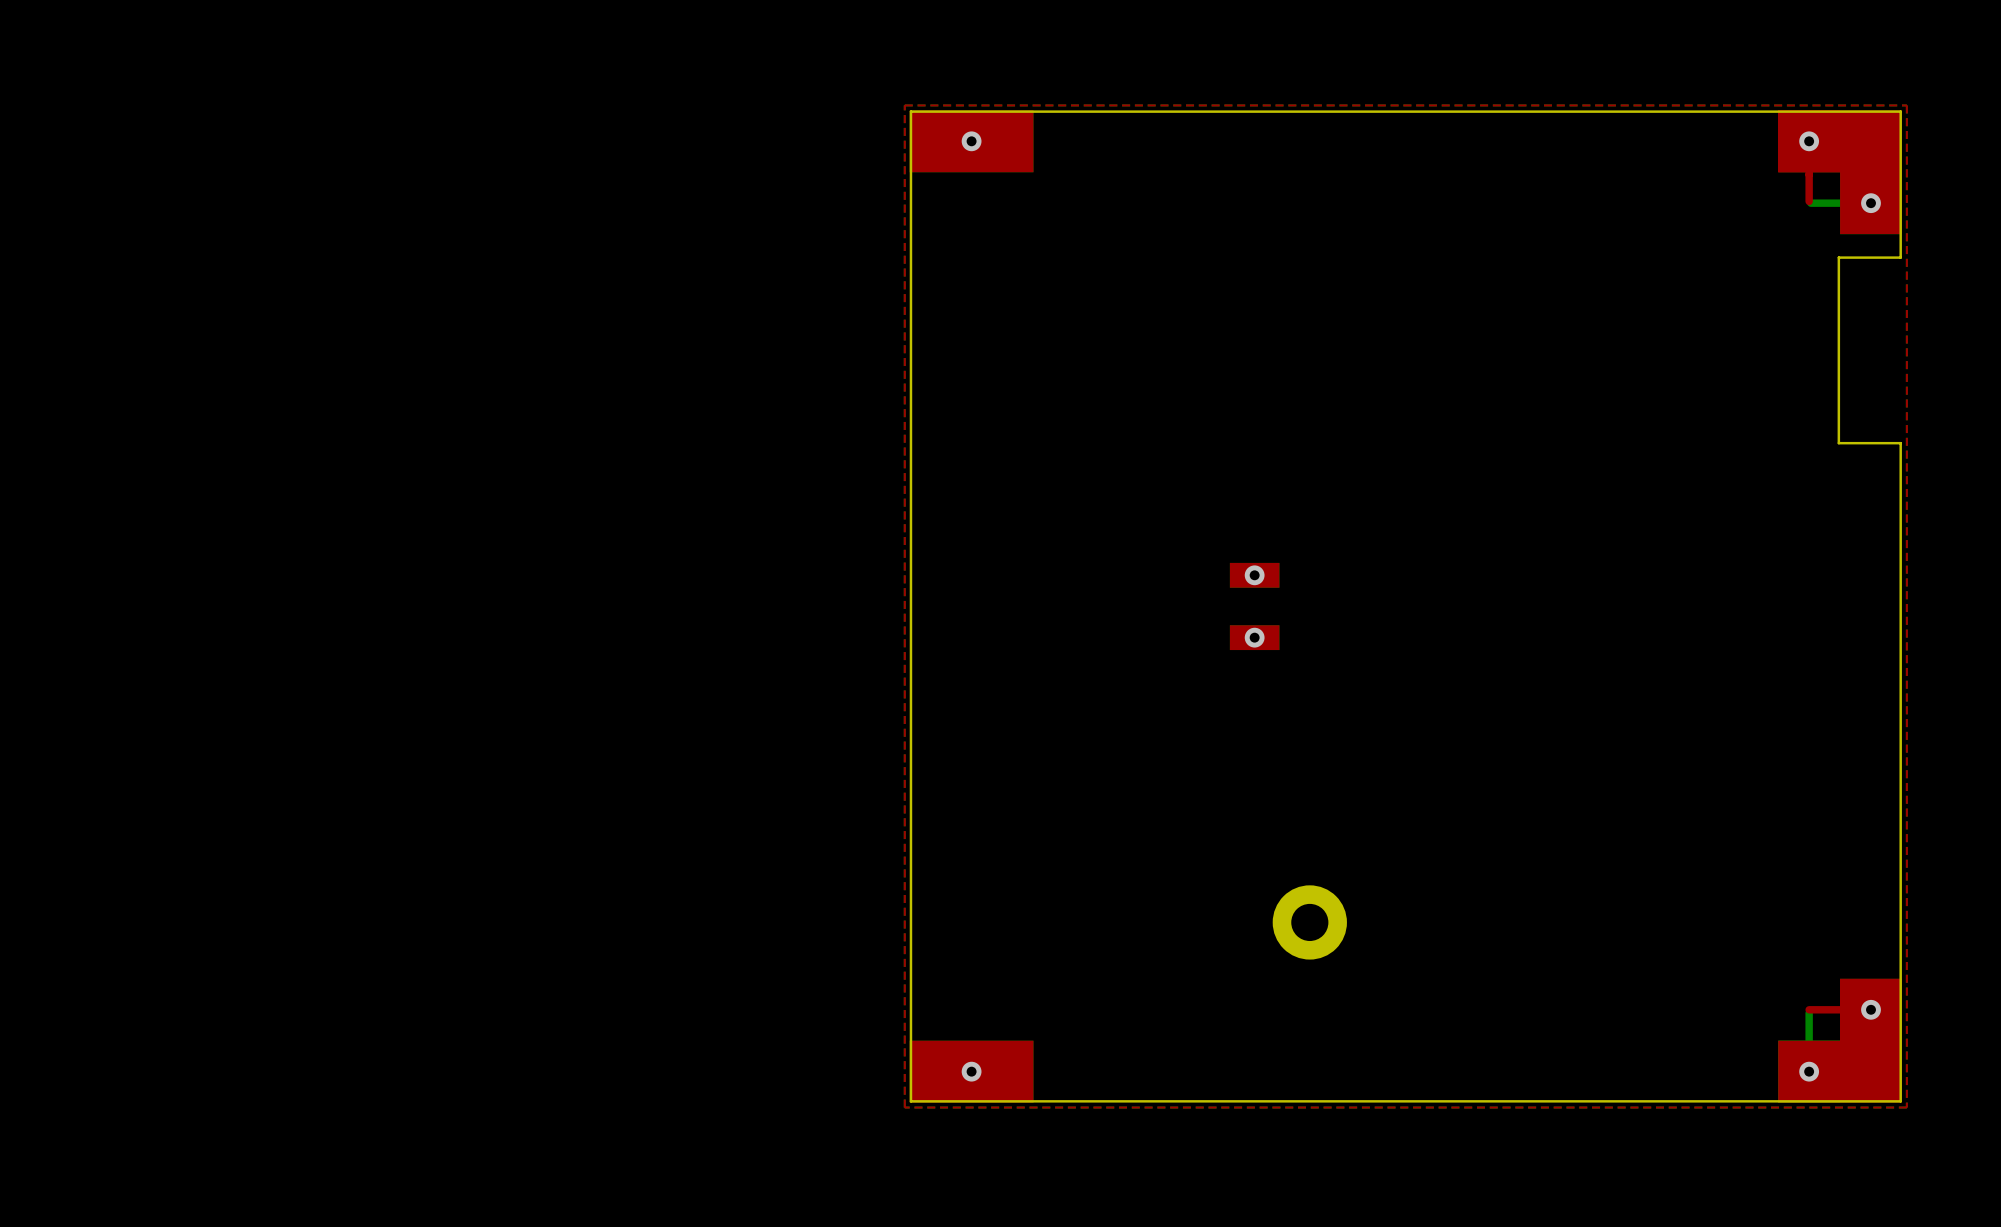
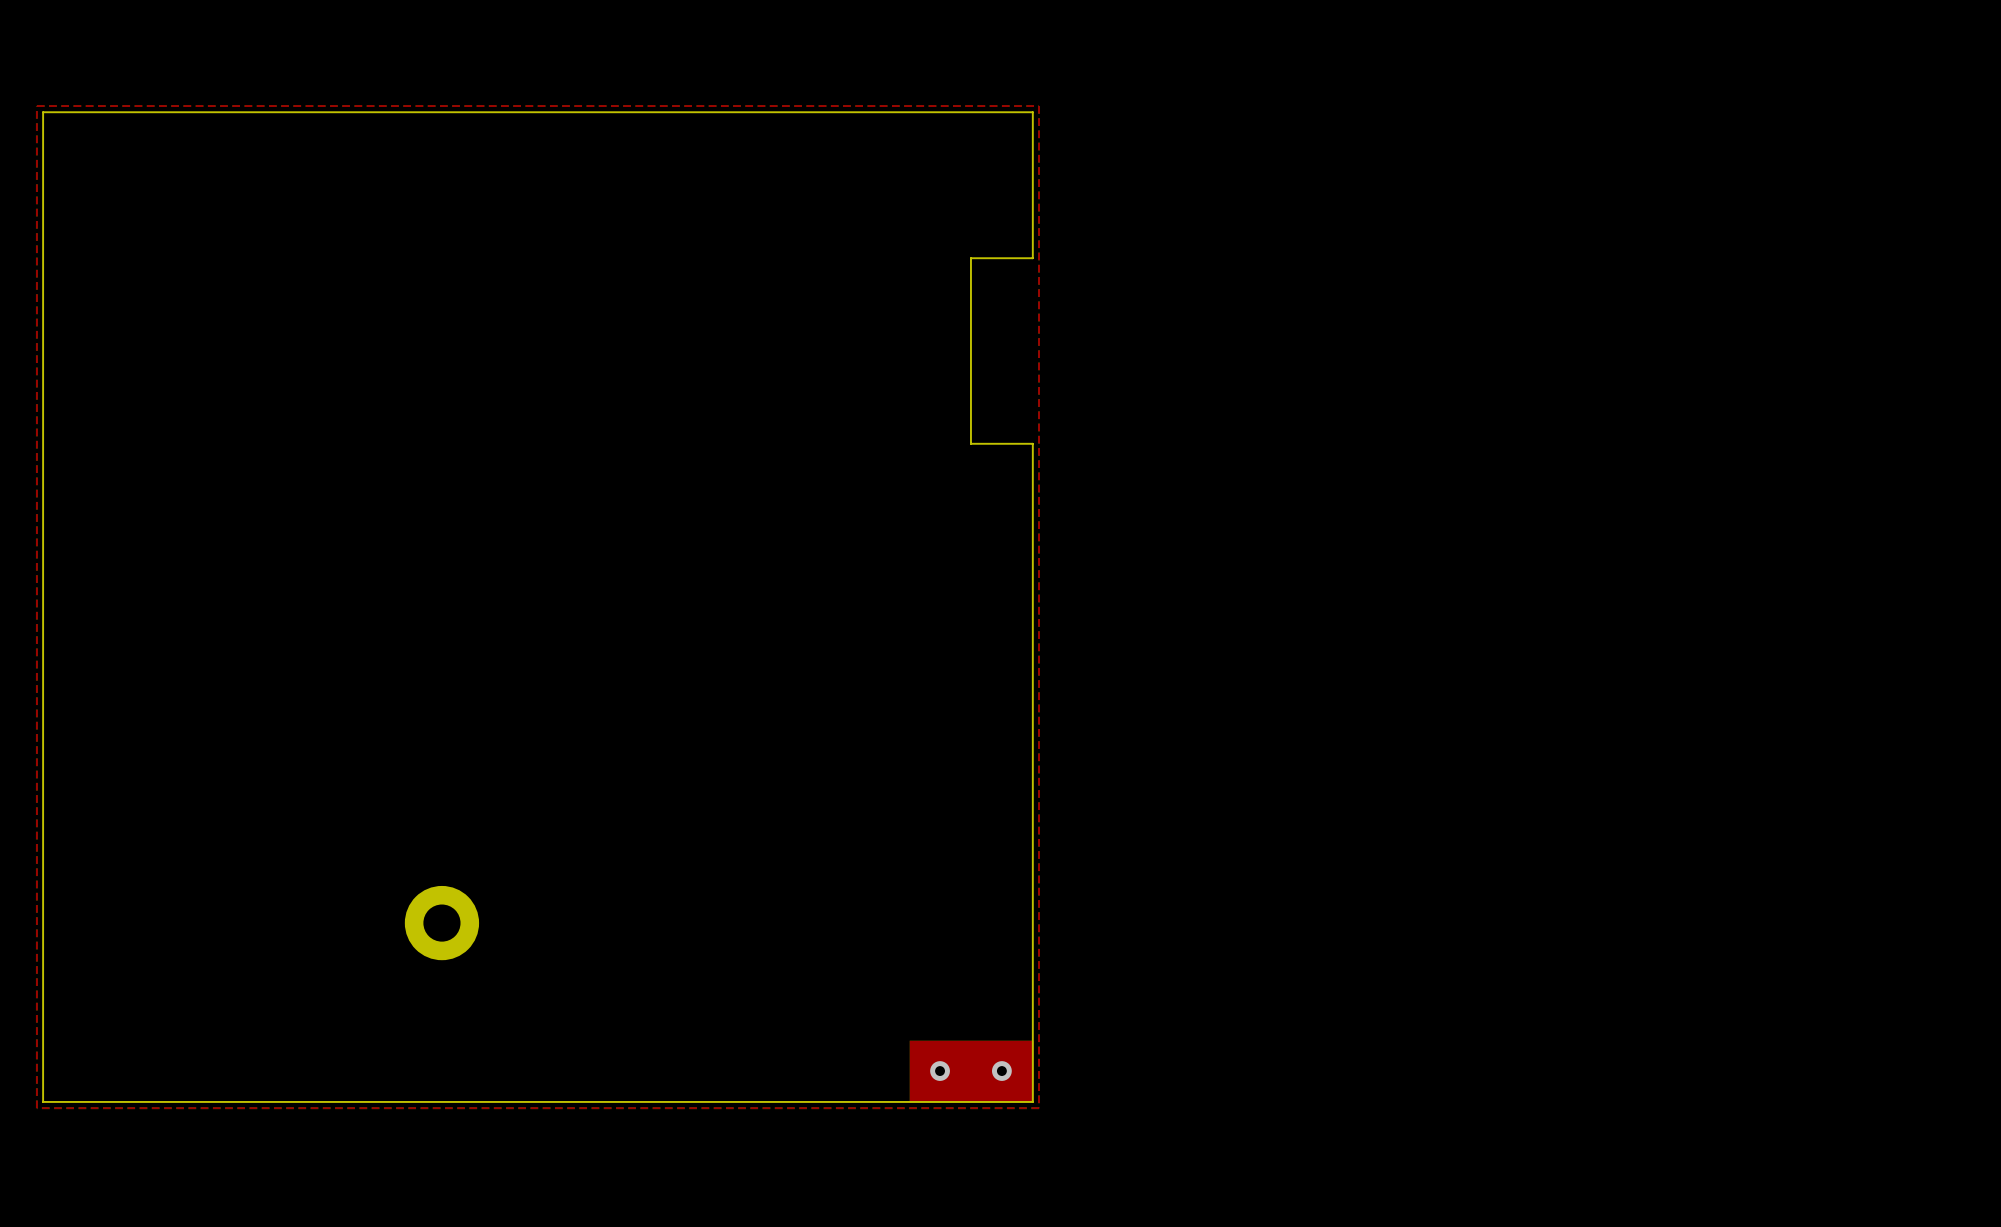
top zone outline: (904, 105) (1906, 105) (1906, 1107) (904, 1107) (904, 105) -> none
top zone outline: none -> (36, 106) (1039, 106) (1039, 1108) (36, 1108) (36, 106)
board edge: (910, 111) (910, 1101) (1900, 1101) (1900, 443) (1838, 443) (1838, 257) (1900, 257) (1900, 111) (910, 111) -> none
board edge: none -> (43, 112) (43, 1101) (1032, 1101) (1032, 443) (970, 443) (970, 258) (1032, 258) (1032, 112) (43, 112)
part: (971, 141) -> none
via: (971, 141) -> none
top track: (1809, 141) (1809, 201) -> none
via: (1809, 141) -> none
part: (1840, 172) -> none
bottom track: (1810, 203) (1871, 203) -> none
via: (1871, 203) -> none
via: (1254, 575) -> none
part: (1254, 606) -> none
via: (1254, 637) -> none
part: (1309, 922) -> none
part: none -> (441, 923)
top track: (1809, 1009) (1871, 1009) -> none
via: (1871, 1009) -> none
bottom track: (1809, 1013) (1809, 1071) -> none
part: (1840, 1040) -> none
via: none -> (940, 1071)
via: (971, 1071) -> none
via: none -> (1001, 1071)
via: (1809, 1071) -> none

